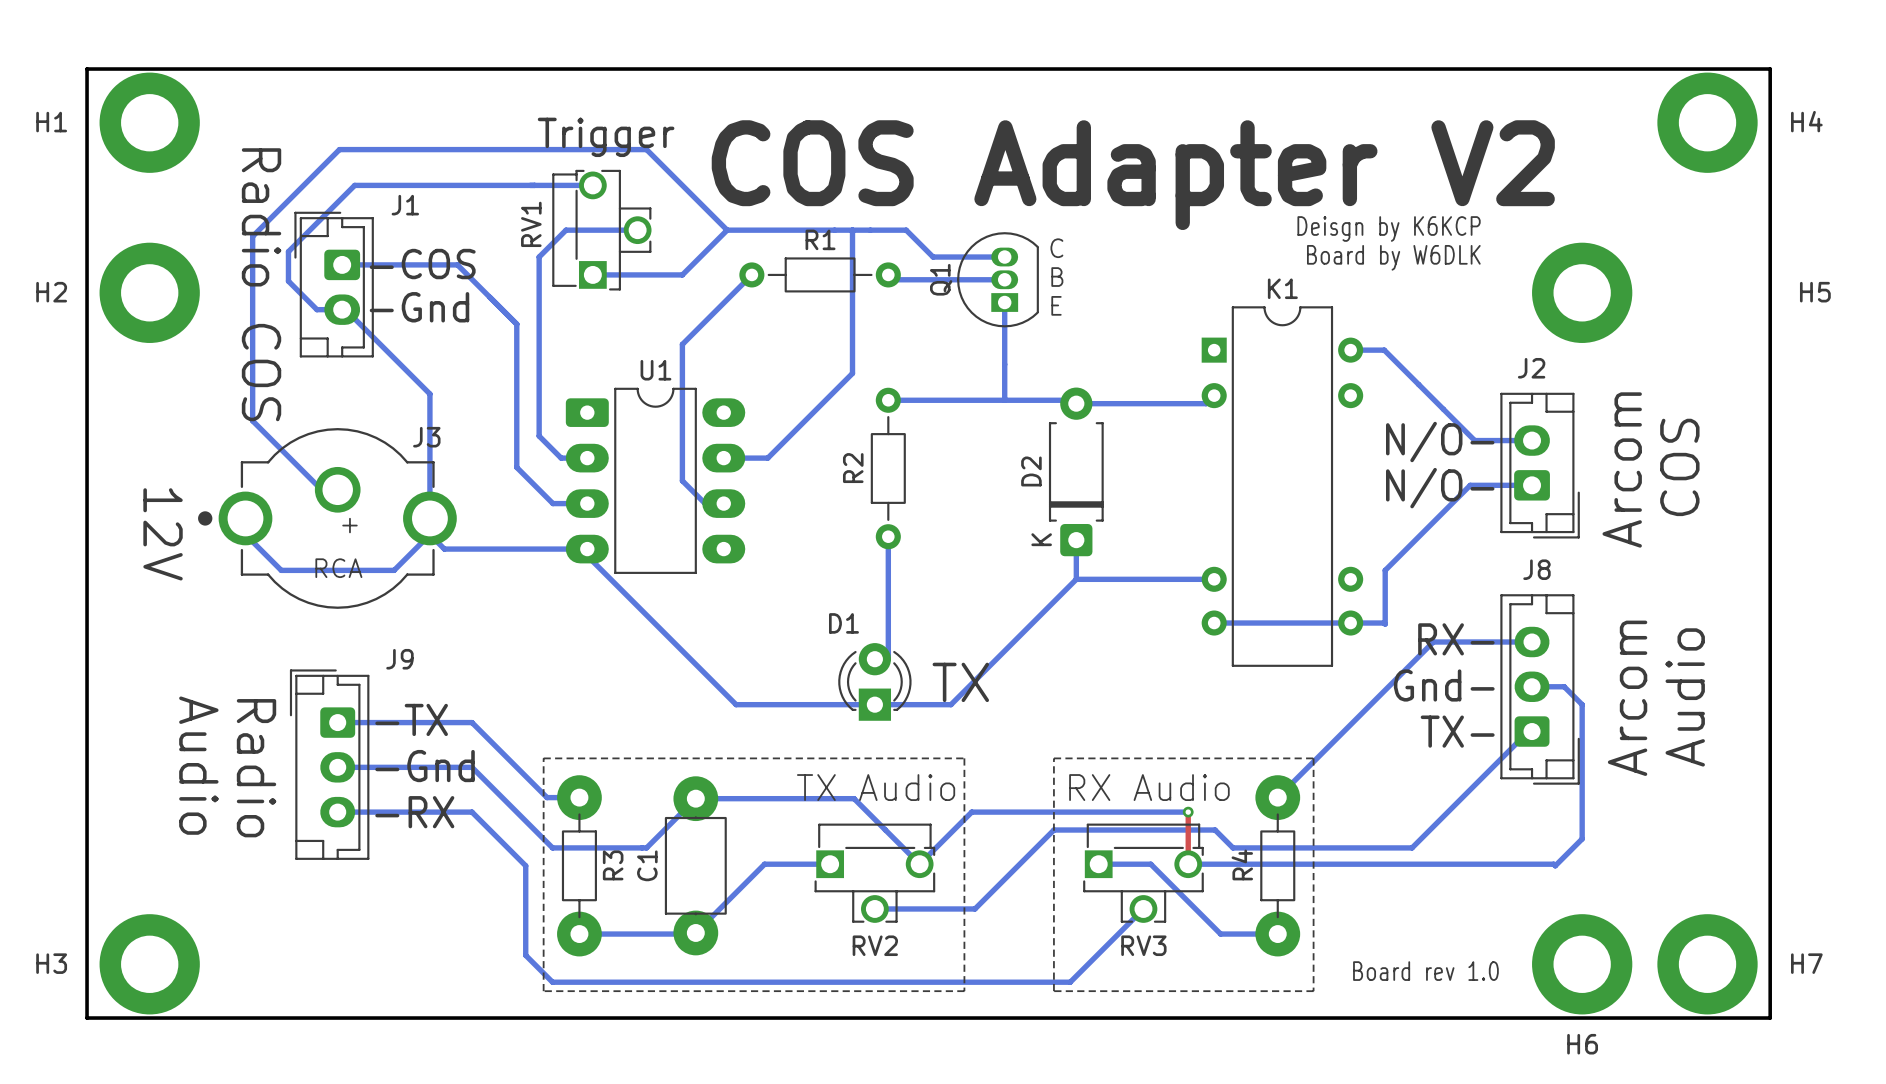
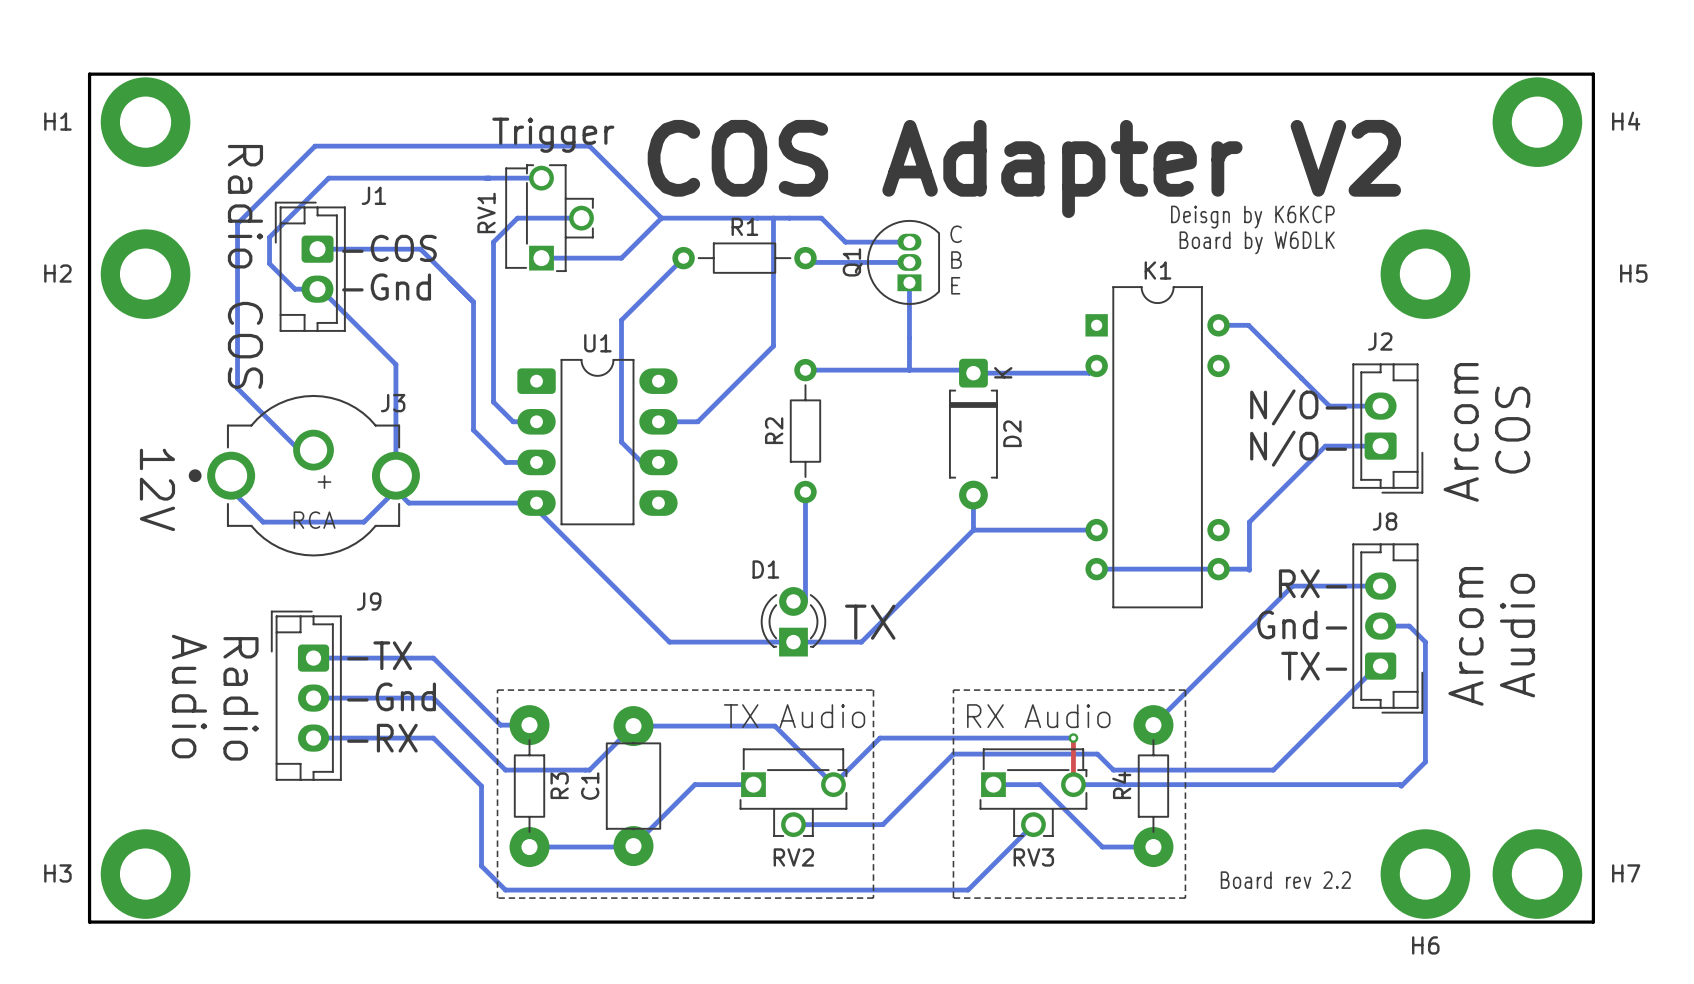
D2 rotation: 0° (1076, 471) -> 180° (973, 434)
text: Board rev 1.0 (1425, 971) -> Board rev 2.2 (1285, 880)

